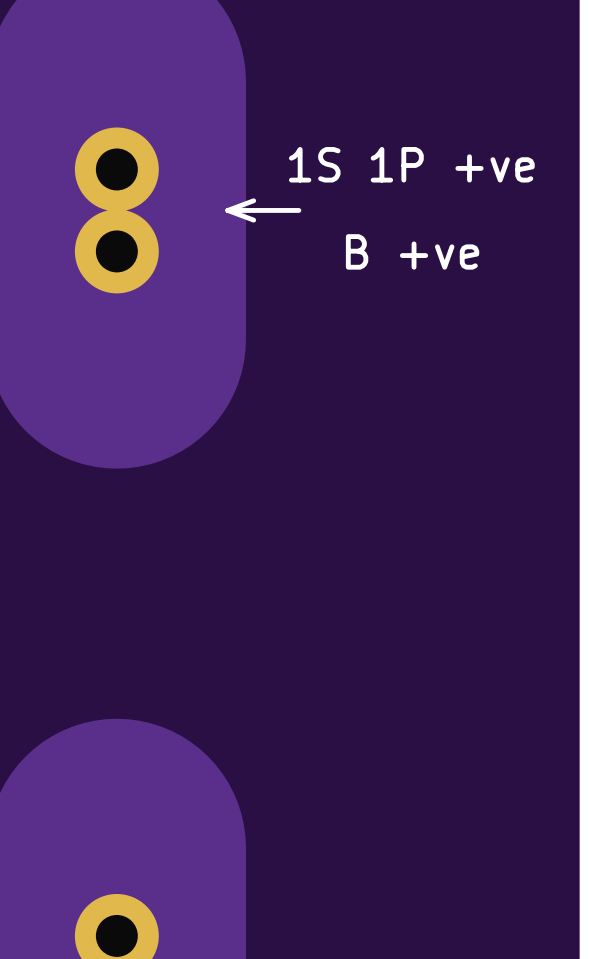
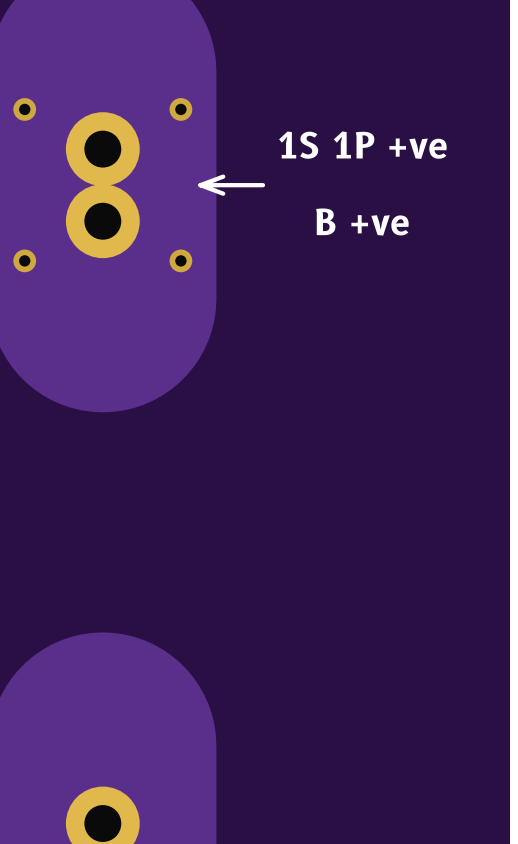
via: none -> (24, 109)
via: none -> (180, 109)
via: none -> (24, 260)
via: none -> (180, 260)

